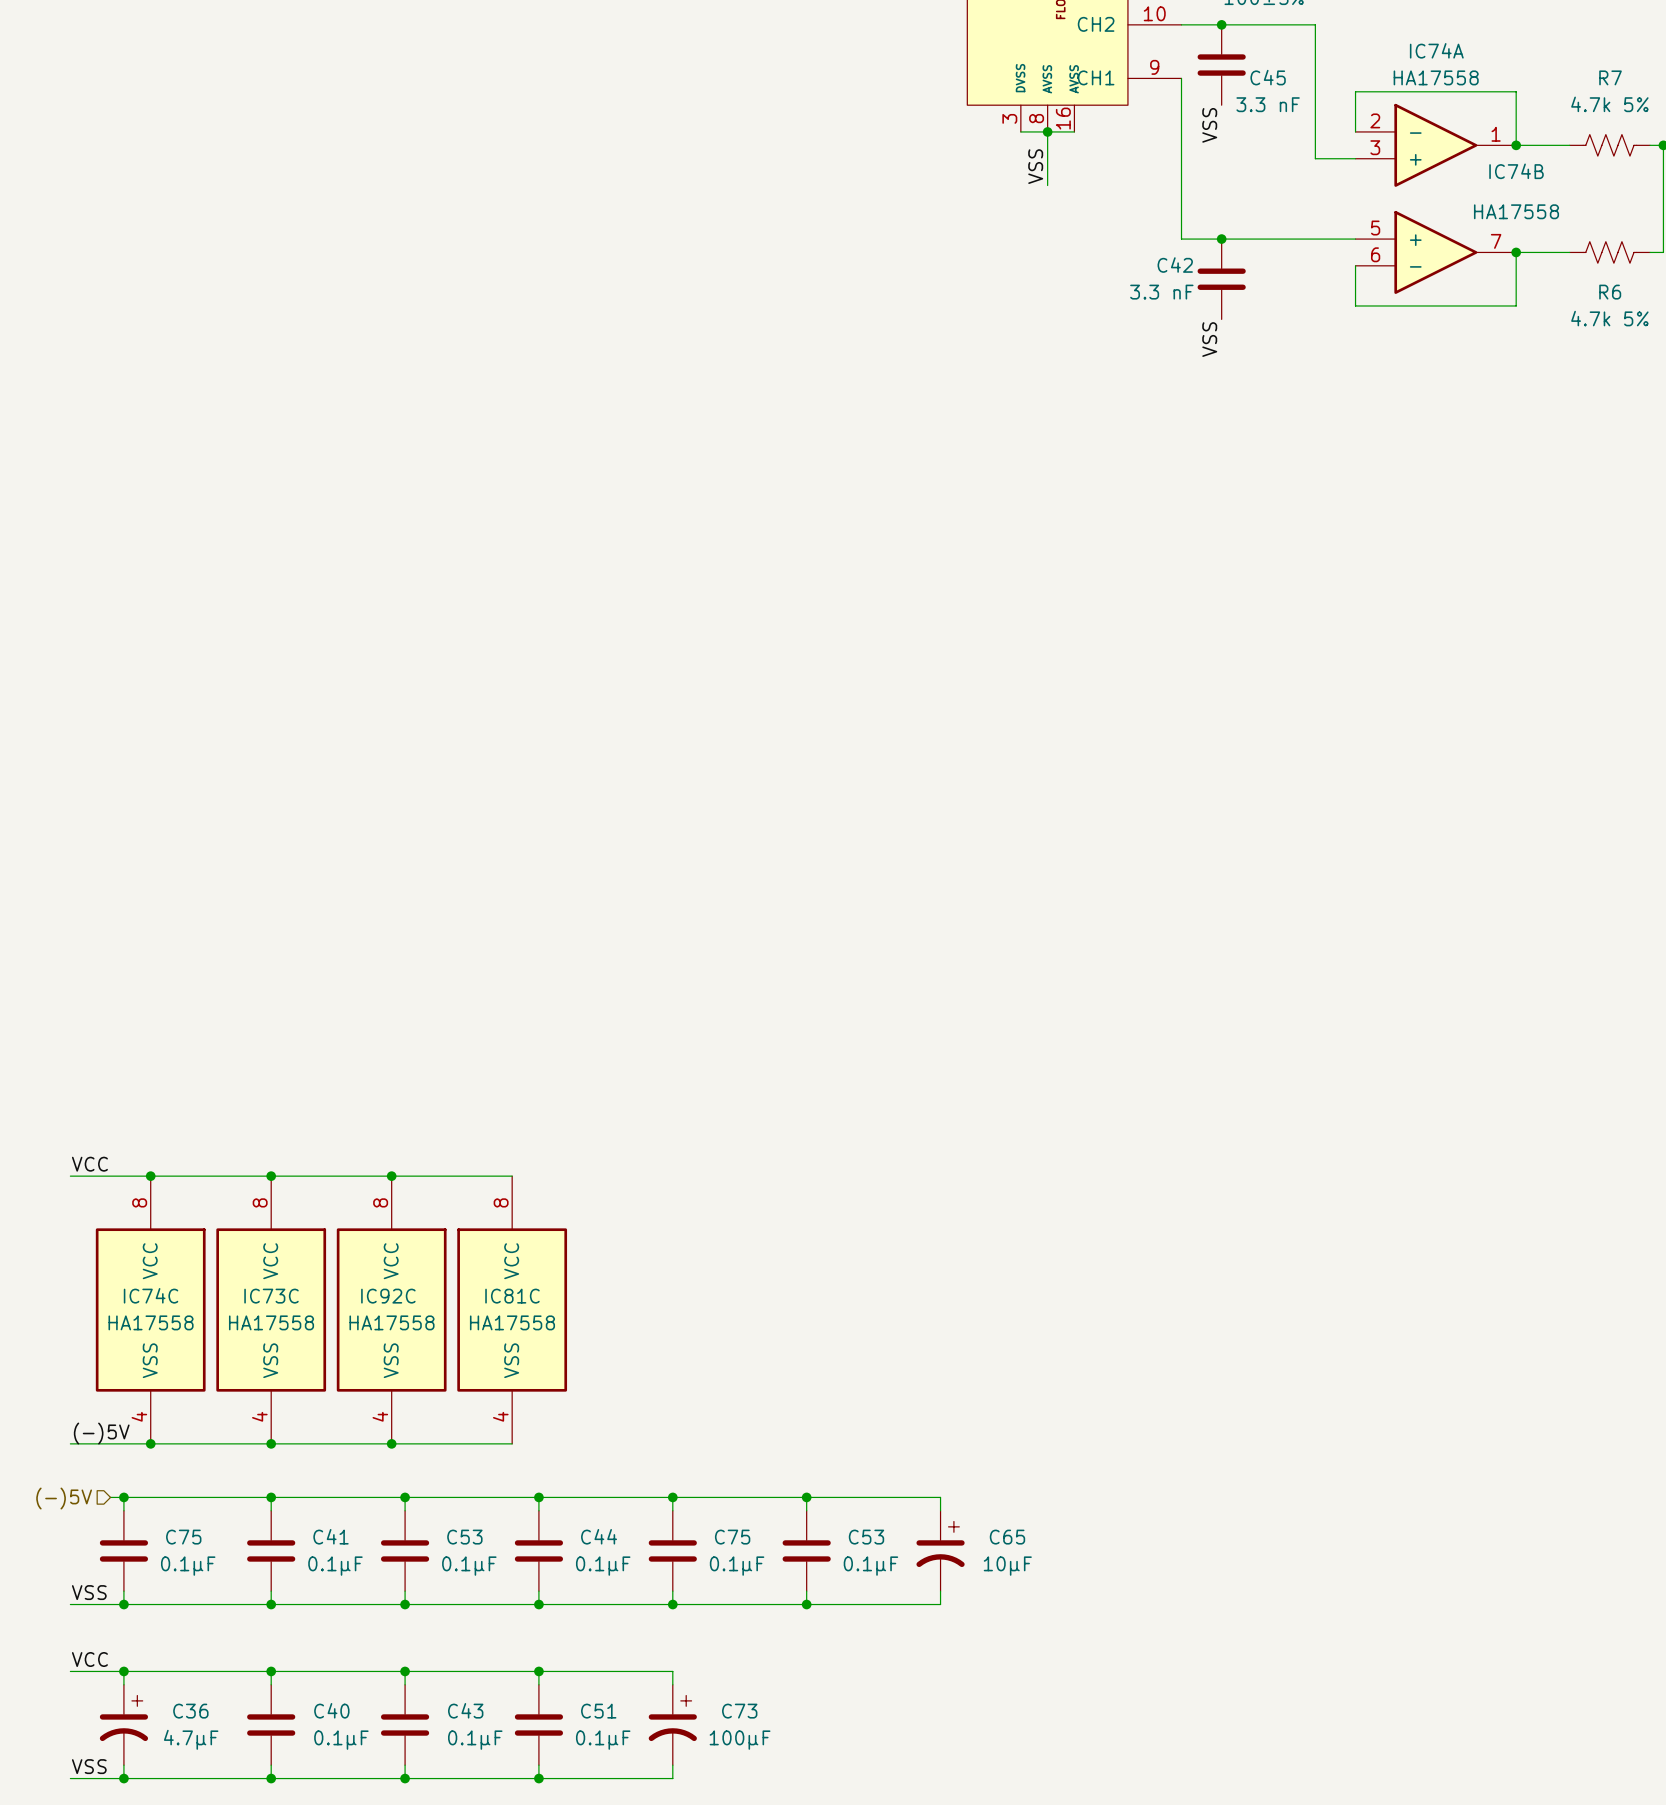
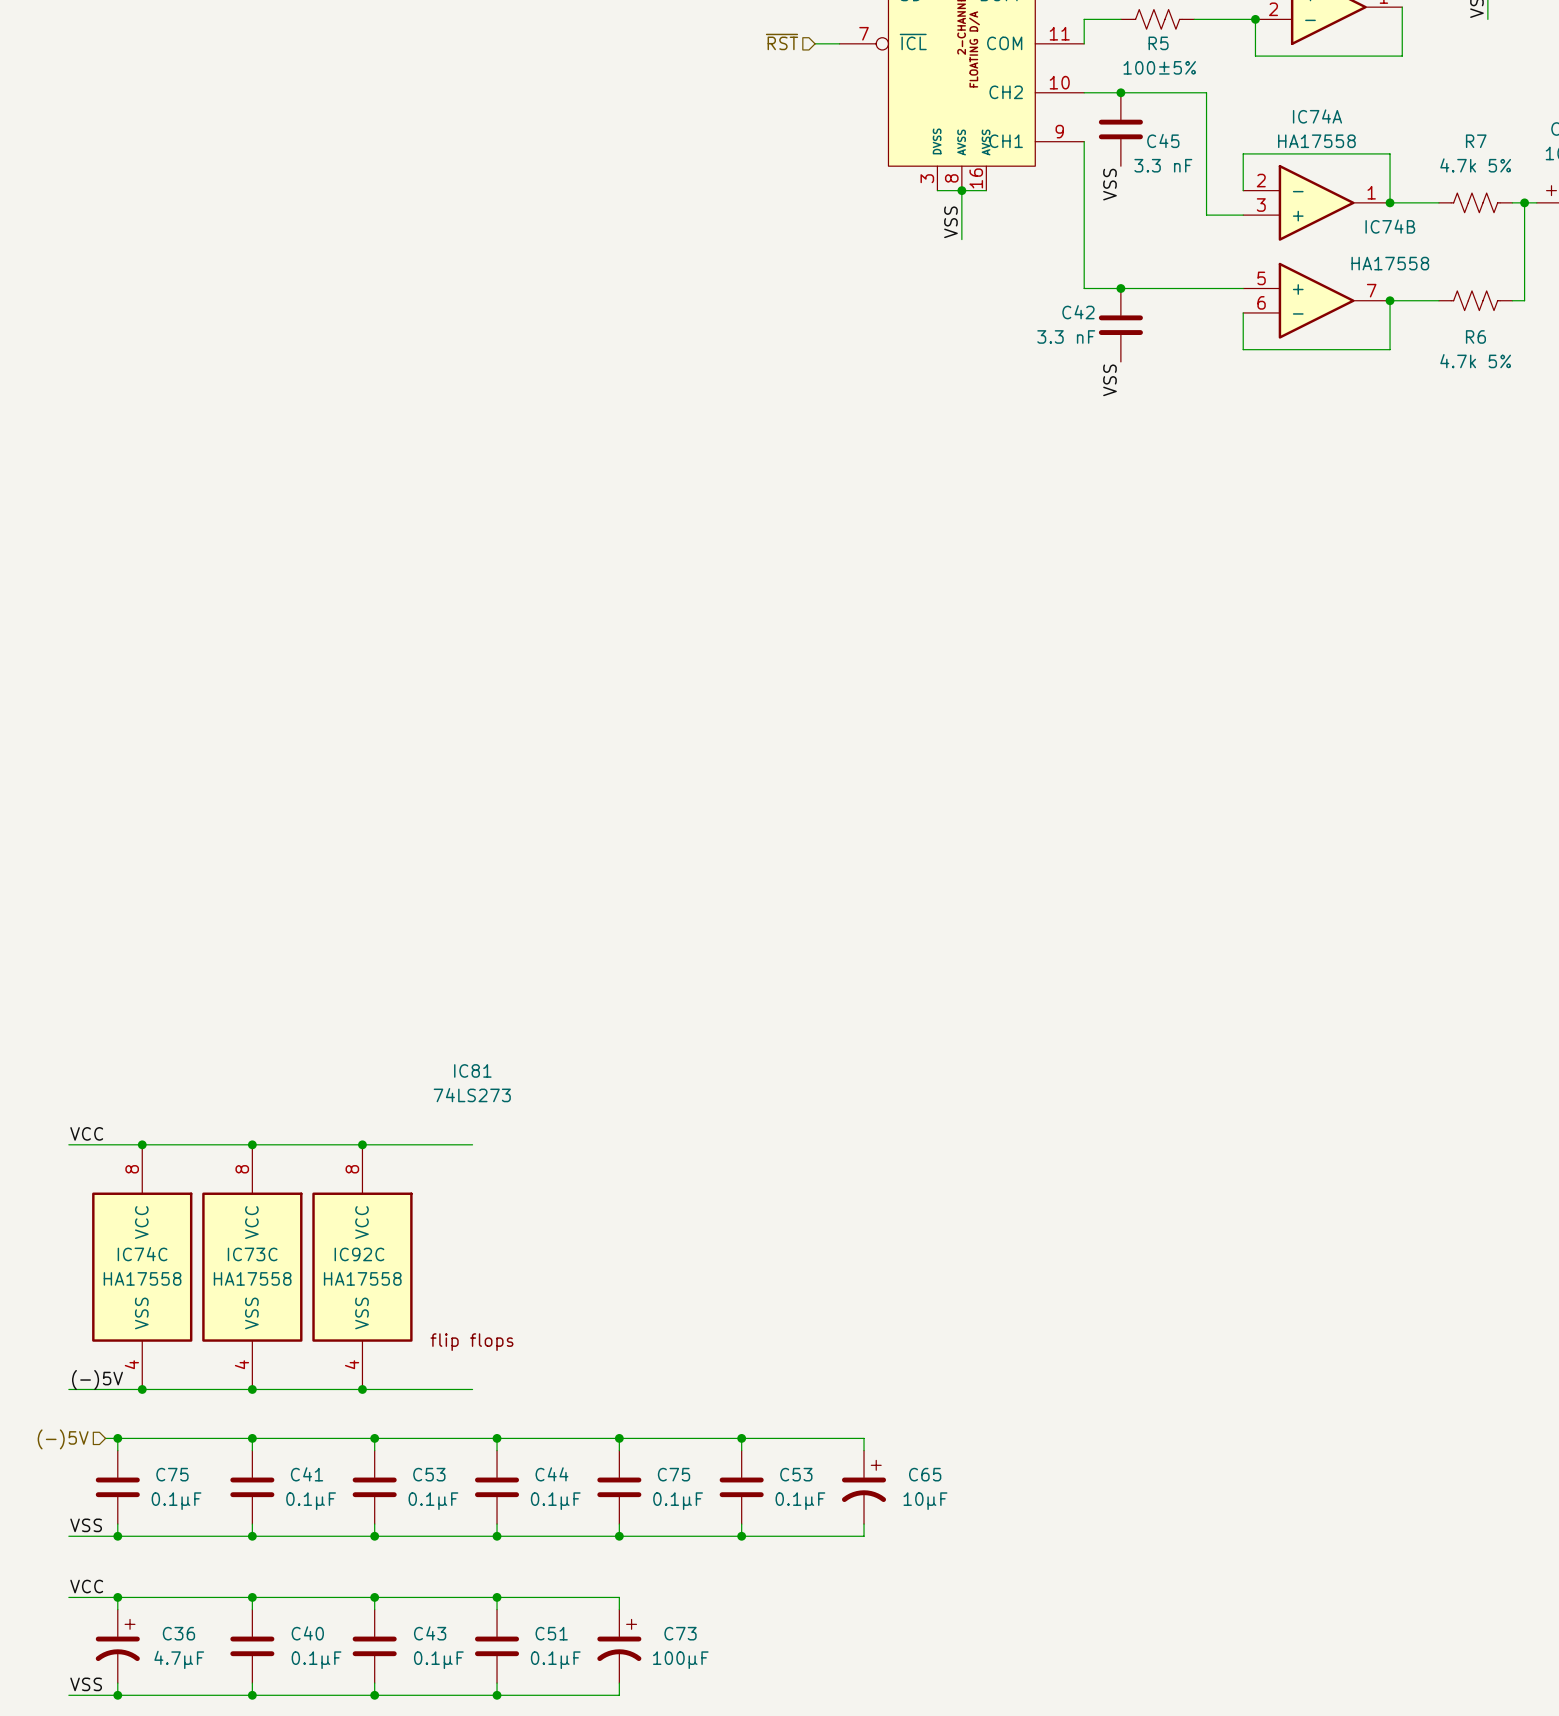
IC81: none -> 74LS273 (471, 1207)
IC81C: HA17558 (512, 1310) -> none

